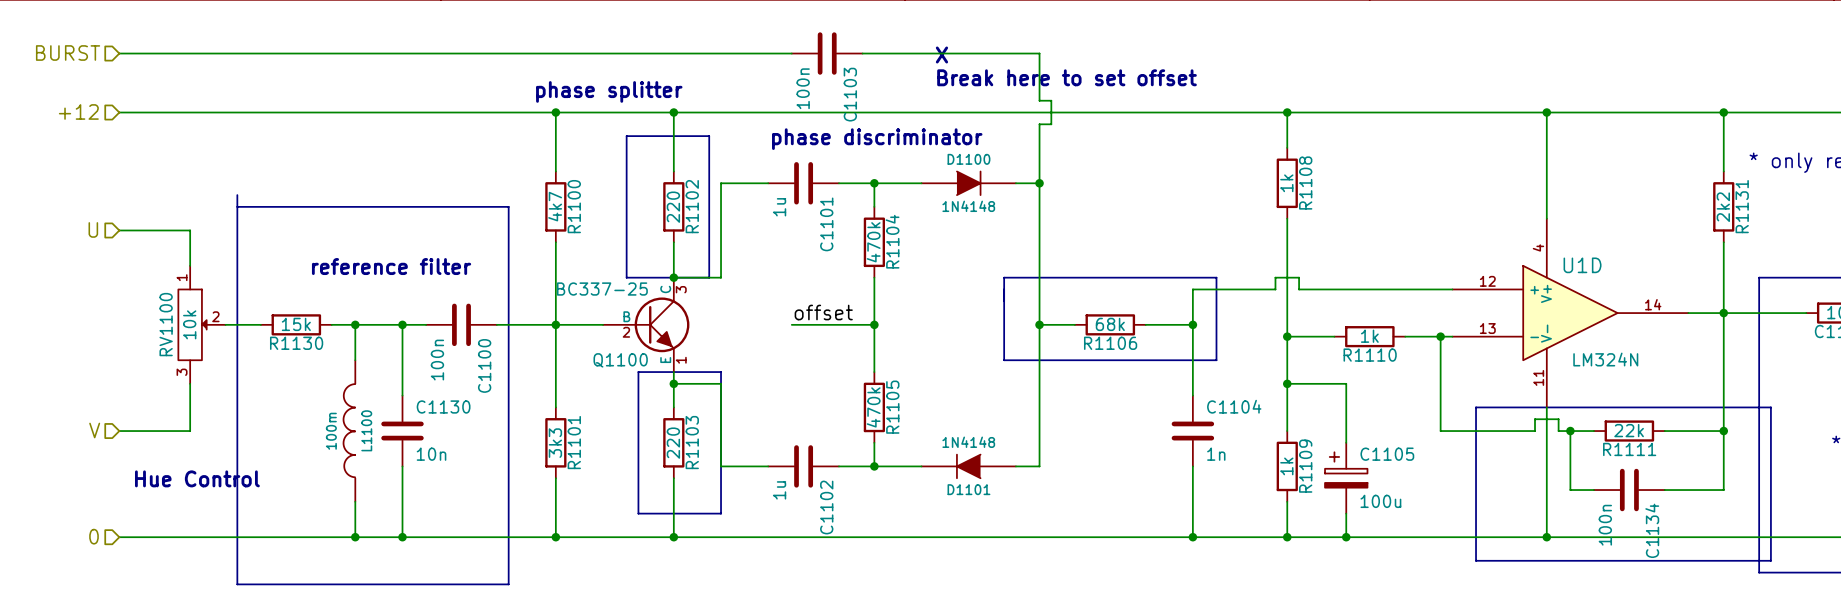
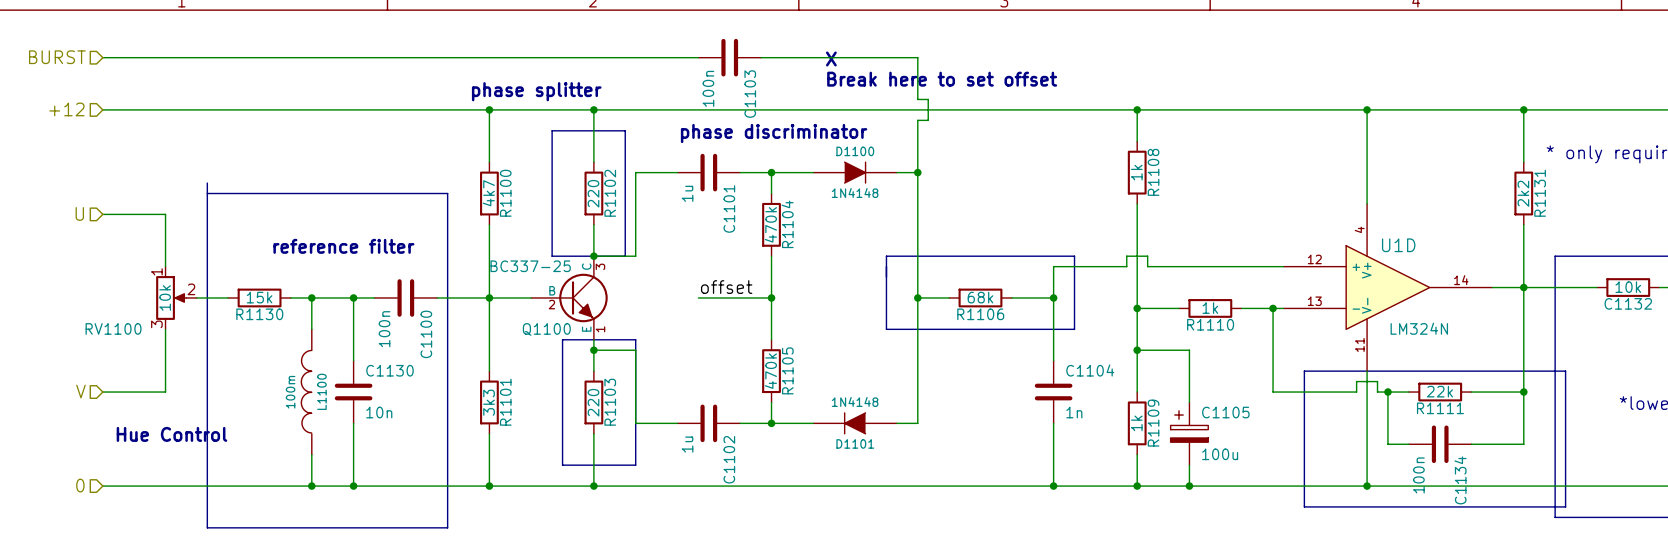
RV1100 symbol: [178, 265, 226, 384] -> [156, 266, 197, 330]
RV1100 name position: RV1100 (166, 324) -> RV1100 (113, 328)

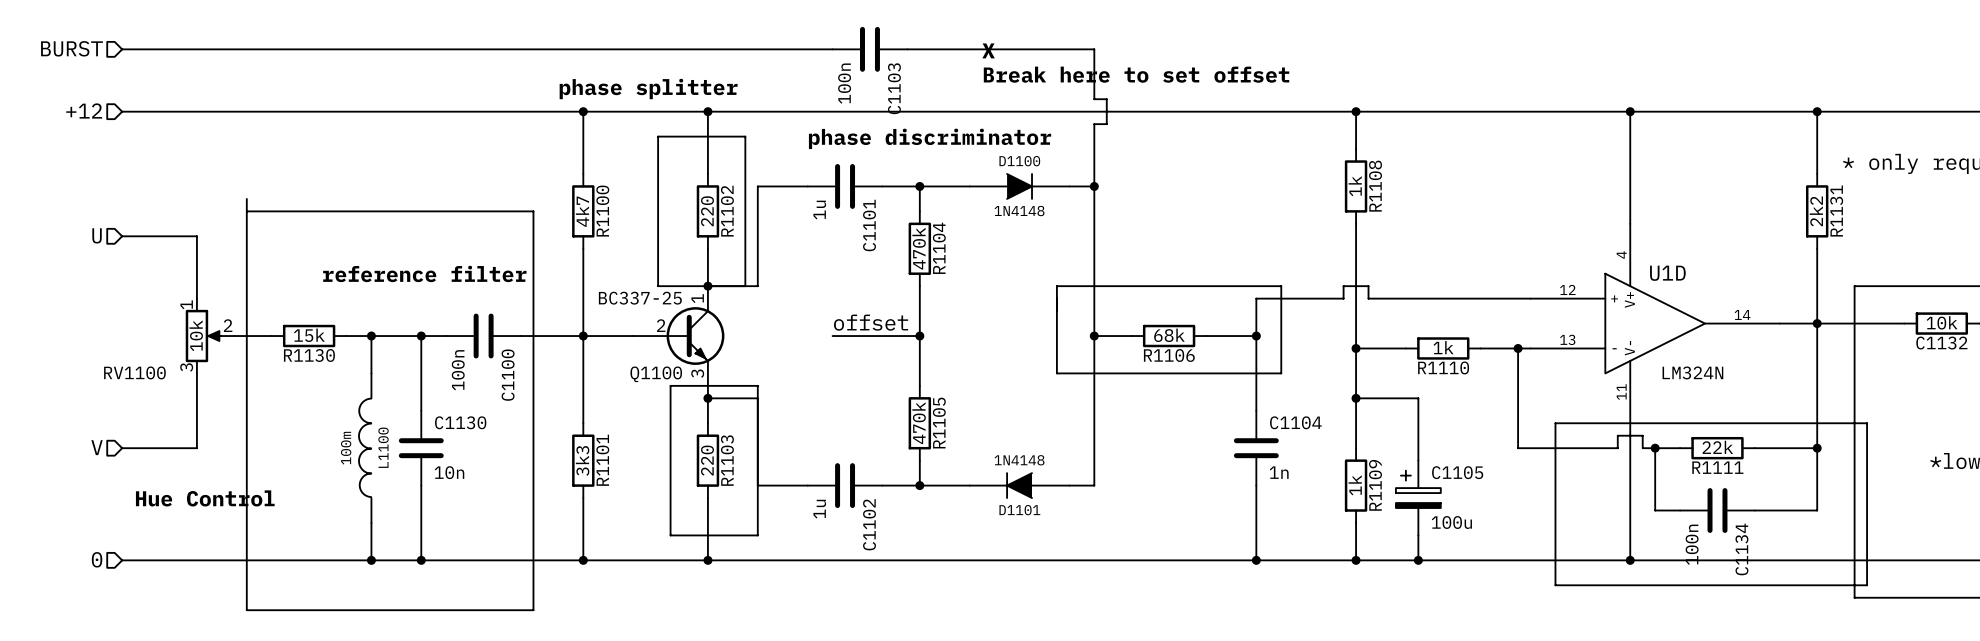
Q1100 symbol: [531, 256, 608, 340] -> [633, 286, 725, 386]

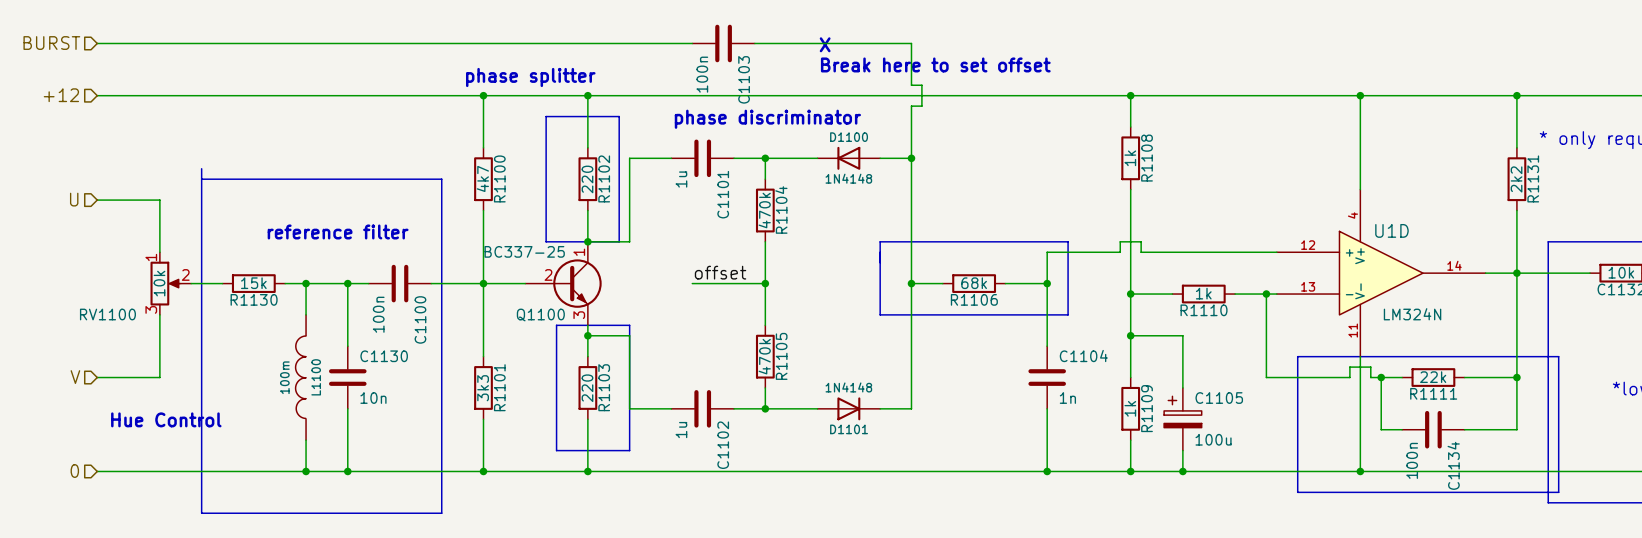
D1100 symbol: [969, 173, 1070, 200] -> [817, 146, 881, 170]
D1101 symbol: [969, 472, 1070, 499] -> [817, 397, 881, 421]

